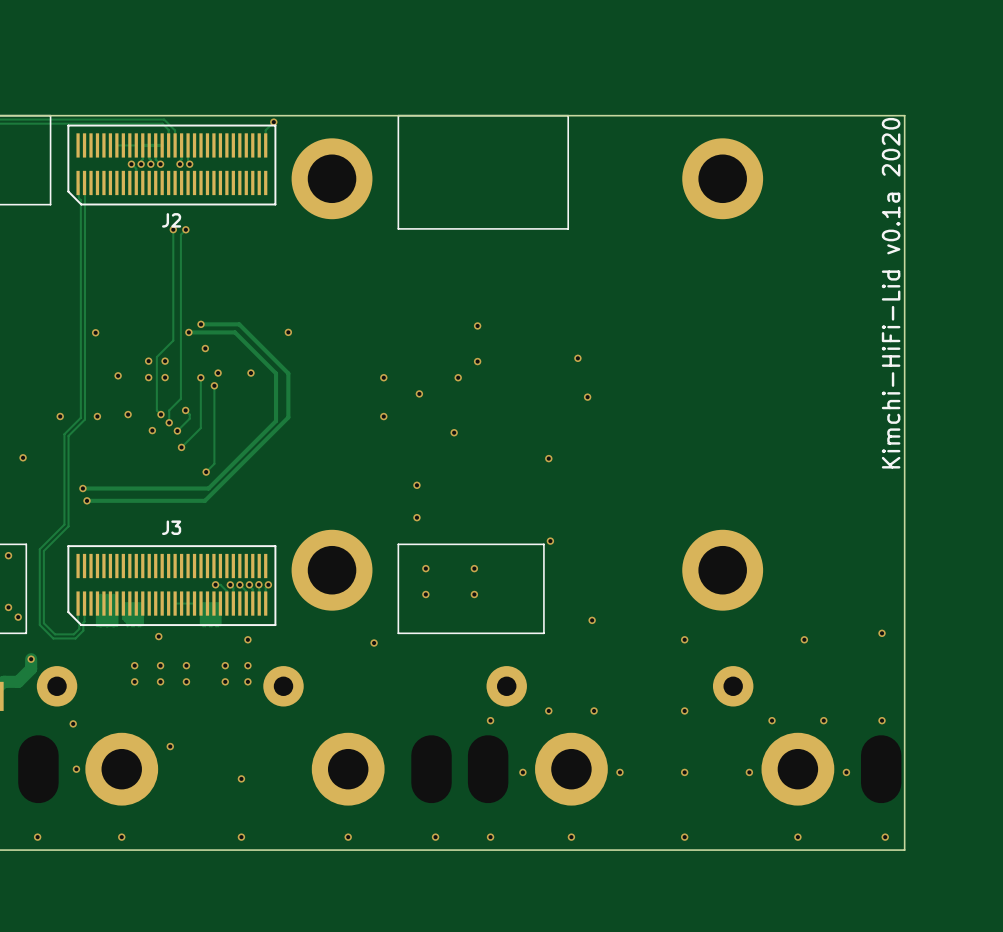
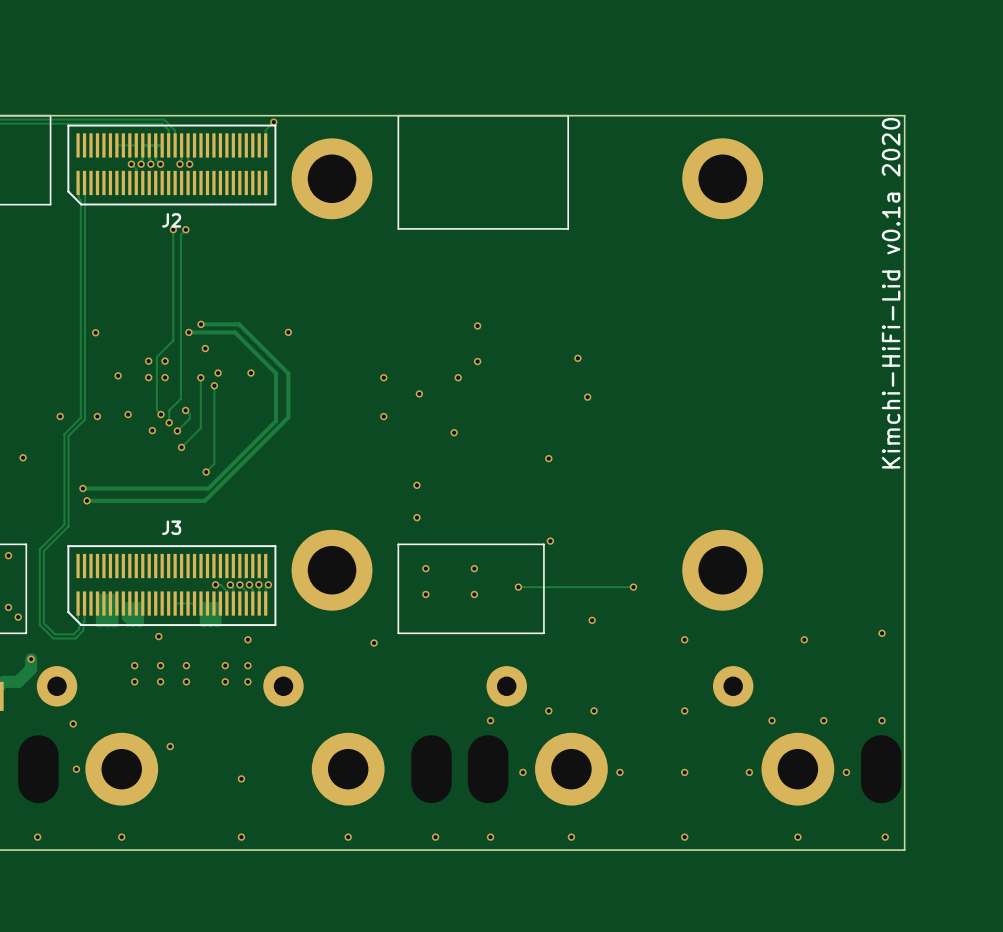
via: none -> (518, 587)
track: none -> (633, 587) (518, 587)
via: none -> (633, 587)

